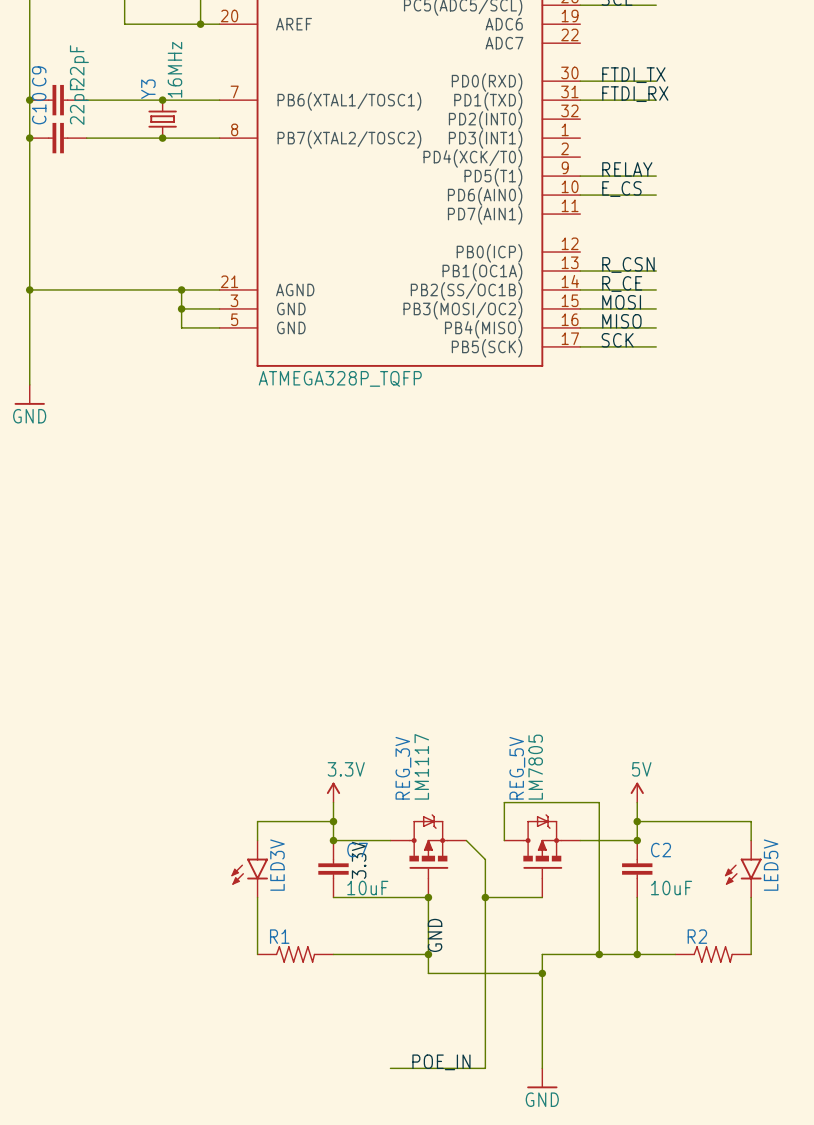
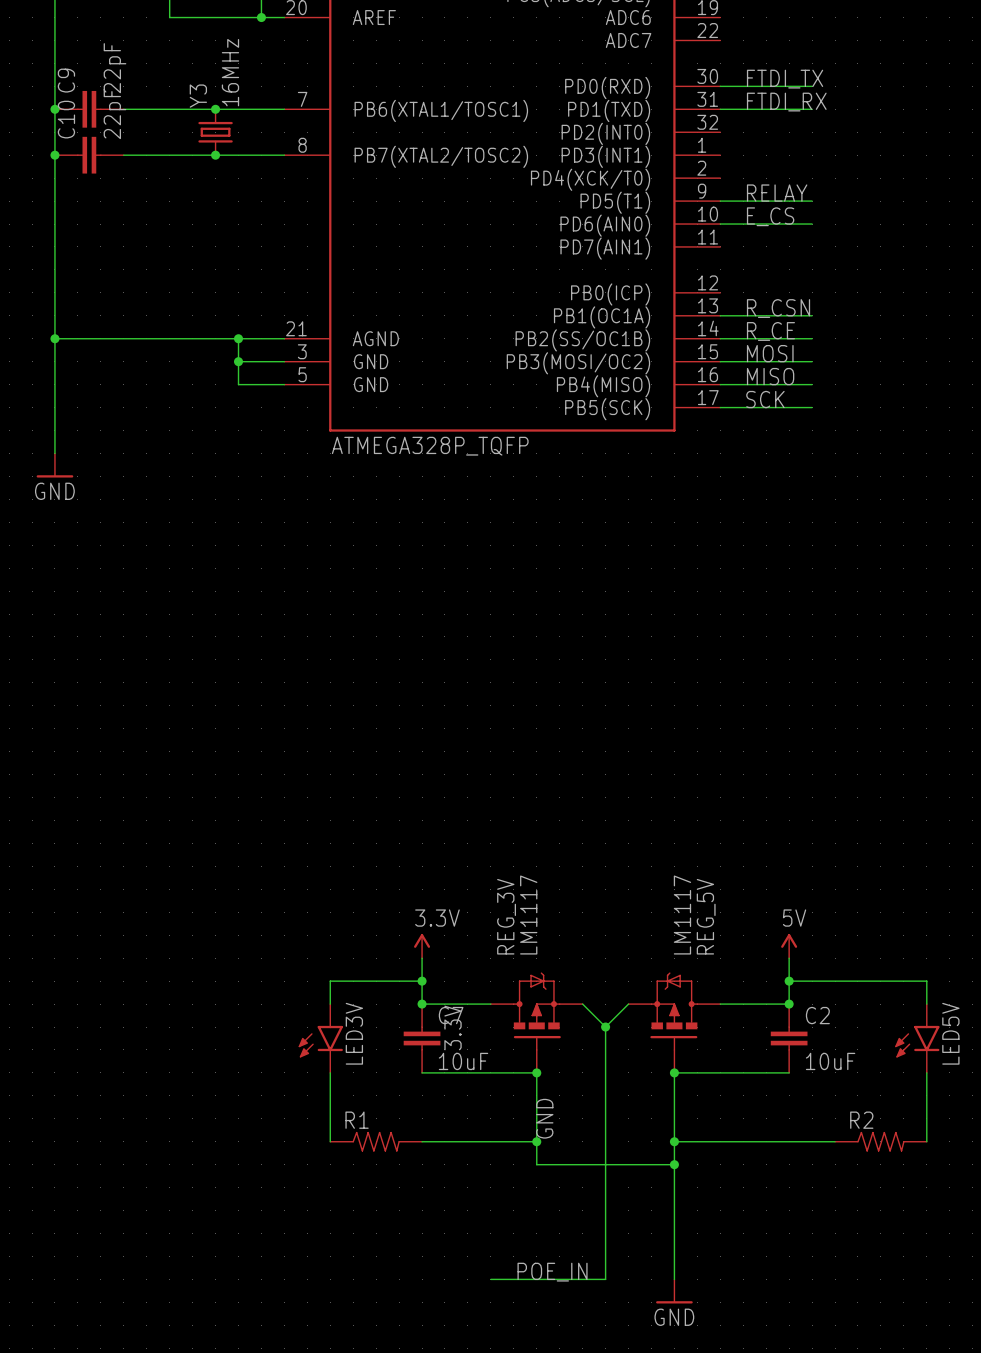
REG_5V value: LM7805 (535, 767) -> LM1117 (682, 915)
wire: (504, 840) (504, 802) (599, 802) (599, 954) -> (628, 1004) (605, 1027)
REG_5V flip: as is (542, 846) -> left-right (674, 1011)
junction: none -> (605, 1027)
wire: (485, 897) (542, 897) -> none
junction: (485, 897) -> none
junction: none -> (674, 1072)
wire: (637, 897) (637, 954) -> (789, 1072) (674, 1072) (674, 1141)
junction: none -> (674, 1141)
junction: (599, 954) -> none
junction: (637, 954) -> none

